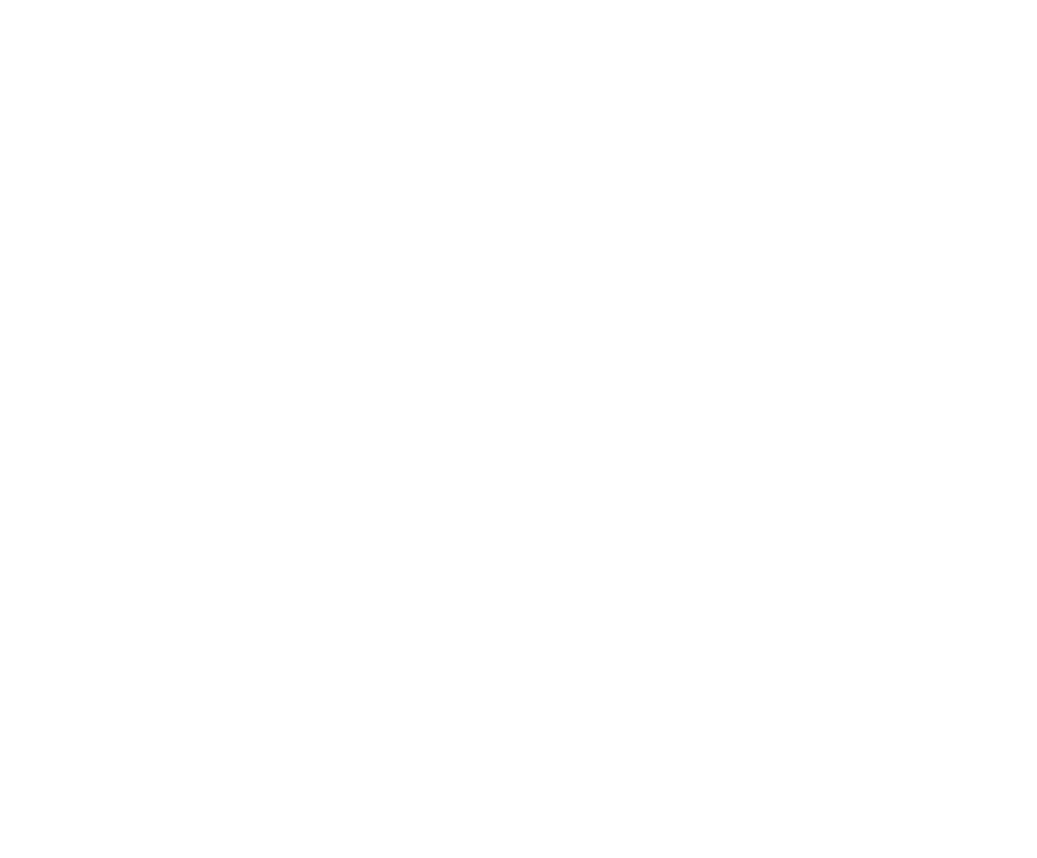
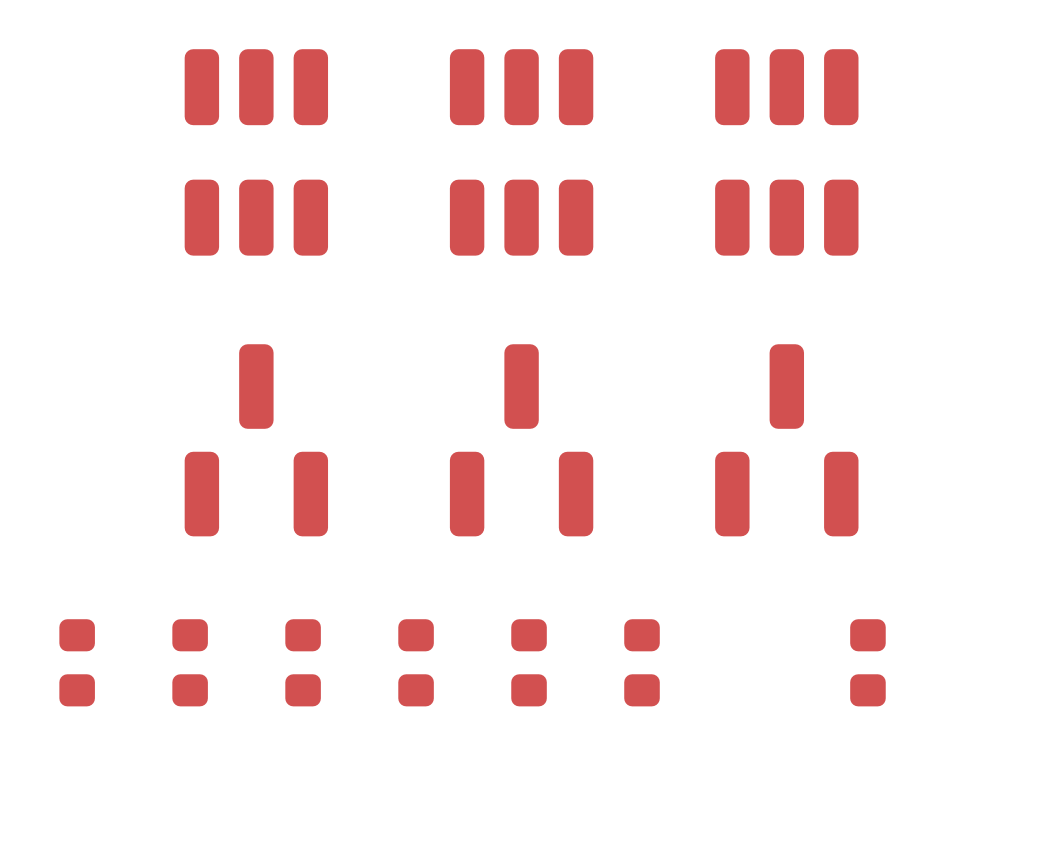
part: none -> (256, 152)
part: none -> (521, 152)
part: none -> (786, 152)
part: none -> (256, 440)
part: none -> (521, 440)
part: none -> (786, 440)
part: none -> (77, 662)
part: none -> (190, 662)
part: none -> (303, 662)
part: none -> (416, 662)
part: none -> (529, 662)
part: none -> (642, 662)
part: none -> (867, 662)

